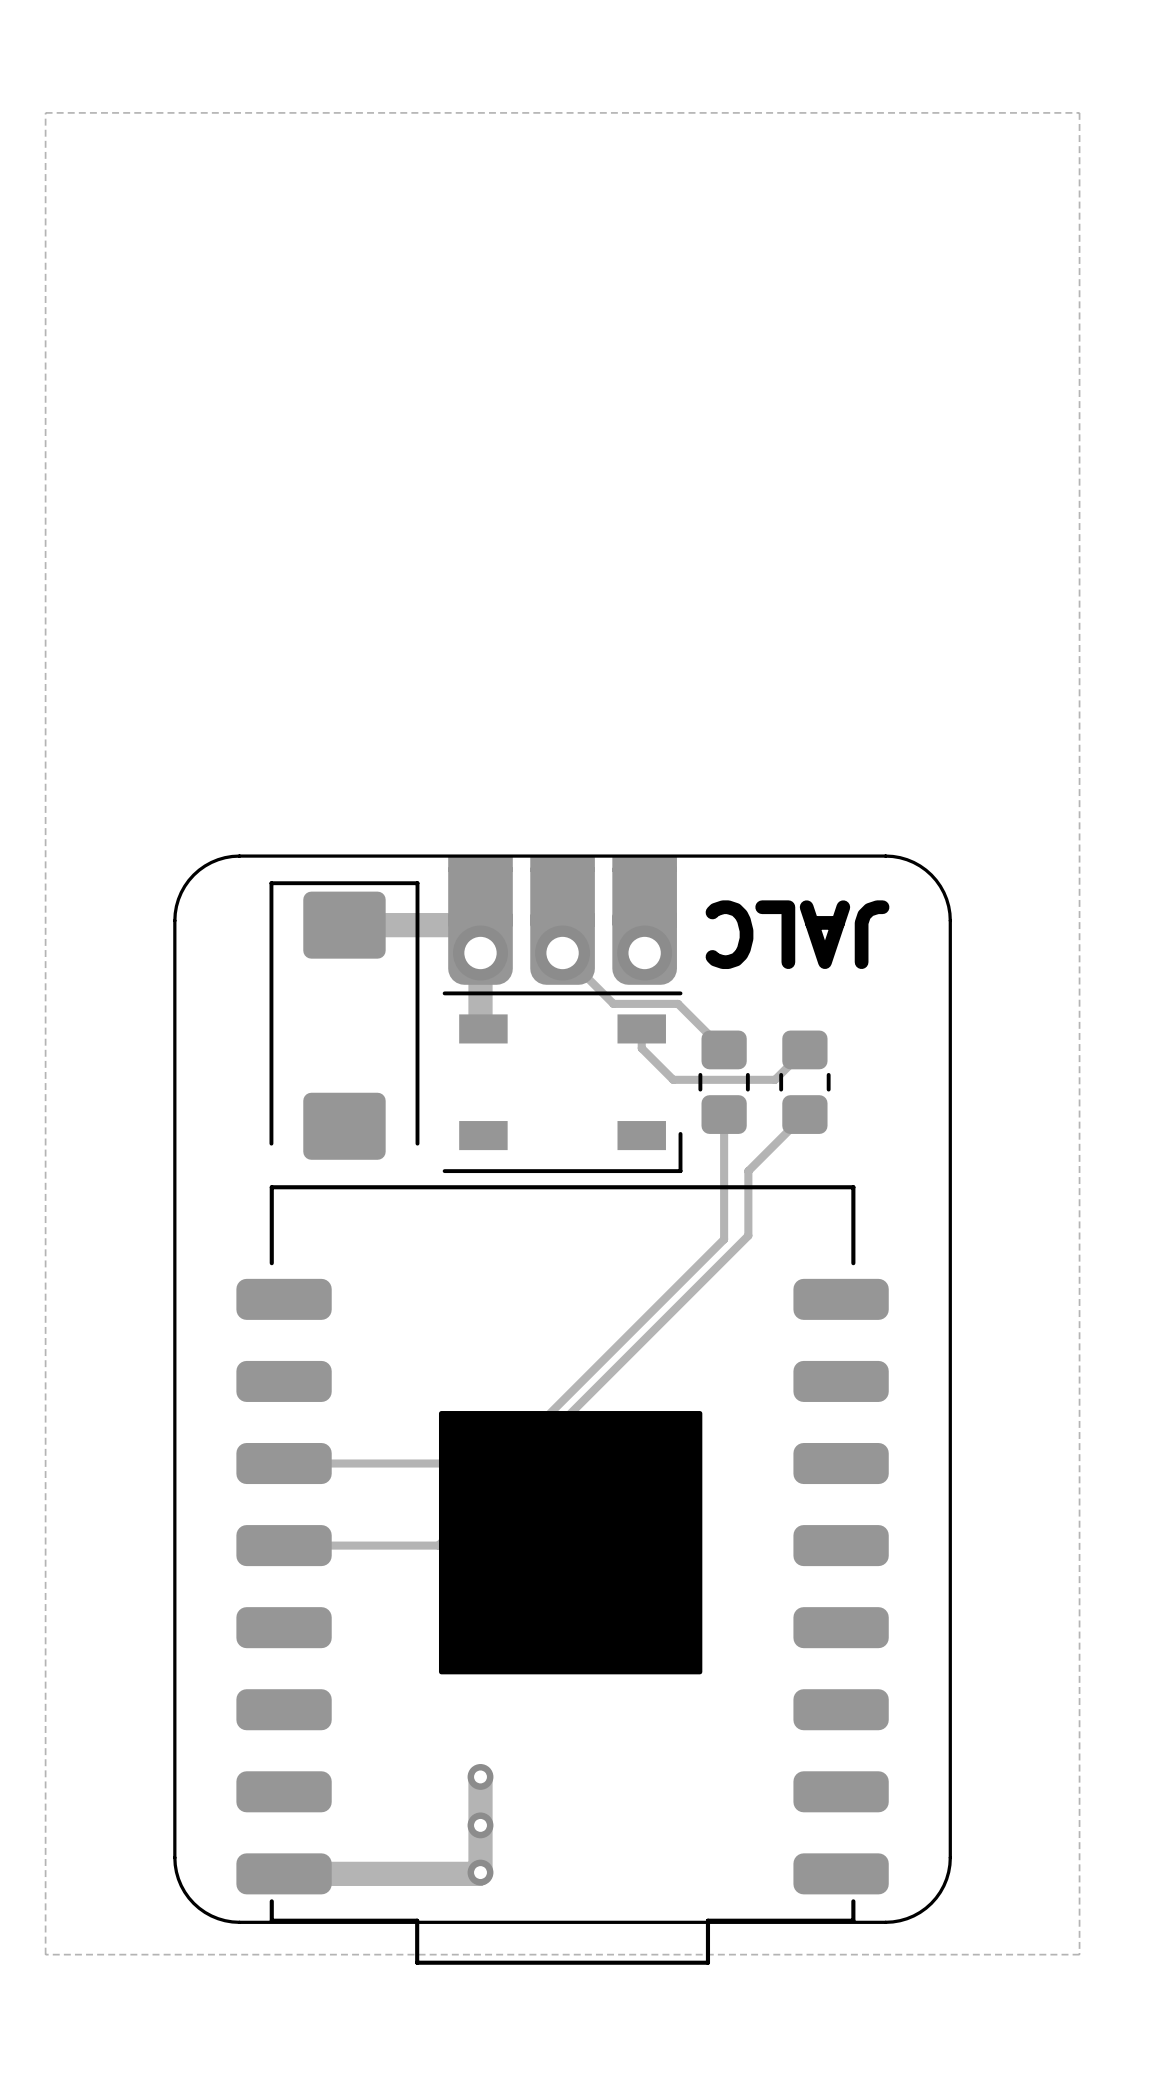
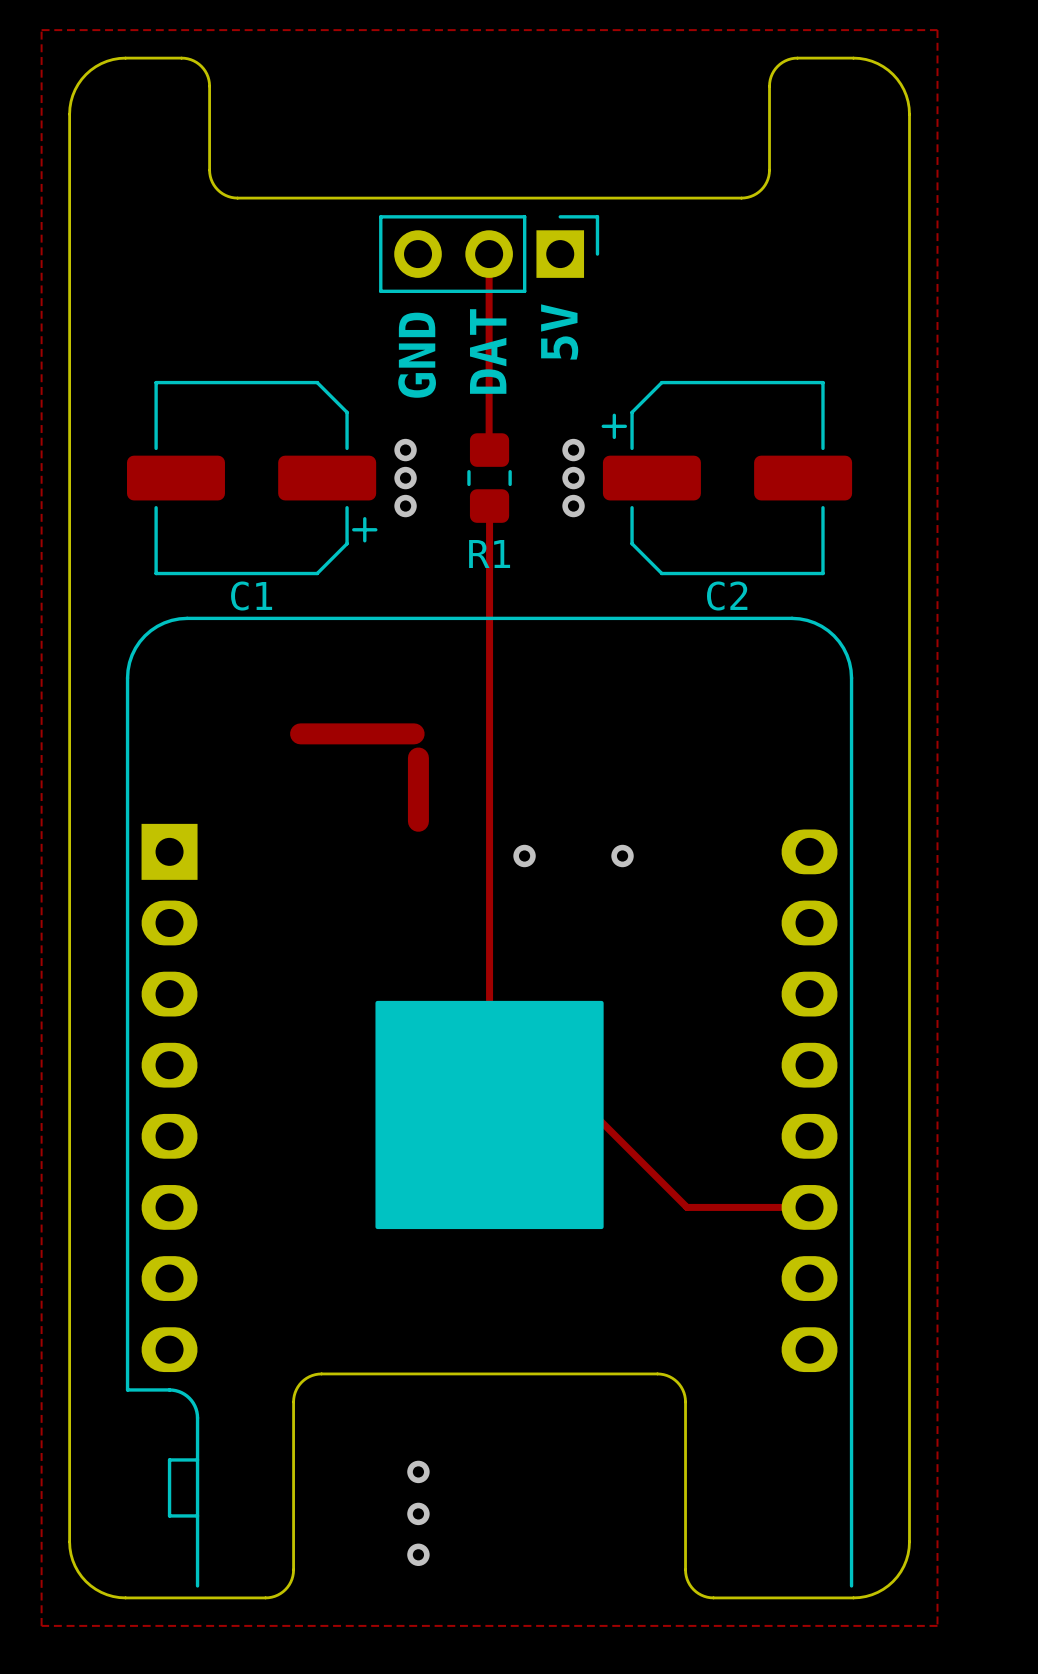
track: none -> (489, 254) (489, 450)
part: none -> (489, 254)
text: none -> 5V (559, 331)
text: none -> DAT (488, 351)
text: none -> GND (417, 355)
via: none -> (405, 450)
via: none -> (573, 450)
C1: none -> (252, 478)
via: none -> (405, 478)
R1: none -> (489, 478)
via: none -> (573, 478)
C2: none -> (726, 478)
via: none -> (405, 506)
track: none -> (489, 506) (489, 1009) (686, 1207) (809, 1207)
via: none -> (573, 506)
part: (562, 920) -> none
text: JALC (797, 934) -> none
track: (562, 953) (613, 1003) (678, 1003) (724, 1049) -> none
part: (344, 1020) -> none
track: (641, 1028) (641, 1048) (673, 1079) (775, 1079) (804, 1049) -> none
via: none -> (524, 856)
via: none -> (622, 856)
part: (562, 1082) -> none
part: (724, 1082) -> none
part: (804, 1082) -> none
track: (724, 1114) (724, 1239) (500, 1463) (284, 1463) -> none
track: (804, 1114) (748, 1171) (748, 1235) (438, 1545) (284, 1545) -> none
part: none -> (489, 1102)
drawing position: (570, 1542) -> (489, 1114)
part: (562, 1574) -> none
track: (480, 1776) (479, 1873) (284, 1873) -> none
board edge: (239, 1922) (218, 1918) (205, 1912) (193, 1903) (181, 1885) (176, 1872) (174, 1857) (175, 913) (181, 892) (188, 880) (199, 870) (218, 859) (239, 856) (885, 856) (907, 859) (920, 865) (931, 875) (940, 886) (946, 899) (950, 920) (950, 1857) (946, 1879) (940, 1892) (931, 1903) (920, 1912) (907, 1918) (885, 1922) -> (209, 1597) (125, 1597) (107, 1594) (90, 1585) (81, 1576) (72, 1560) (69, 1548) (69, 114) (72, 95) (86, 74) (101, 63) (119, 58) (184, 58) (193, 60) (203, 68) (209, 82) (210, 176) (213, 184) (220, 191) (228, 196) (237, 198) (744, 197) (758, 191) (765, 184) (768, 176) (769, 82) (773, 71) (782, 62) (797, 58) (865, 59) (888, 70) (903, 89) (909, 114) (909, 1548) (906, 1560) (897, 1576) (888, 1585) (871, 1594) (853, 1597) (769, 1597)
board edge: (304, 1922) (821, 1922) -> (265, 1597) (274, 1596) (283, 1591) (289, 1584) (292, 1576) (293, 1398) (296, 1389) (301, 1382) (309, 1376) (321, 1373) (657, 1373) (672, 1378) (681, 1387) (685, 1398) (686, 1576) (689, 1584) (696, 1591) (704, 1596) (713, 1597)

